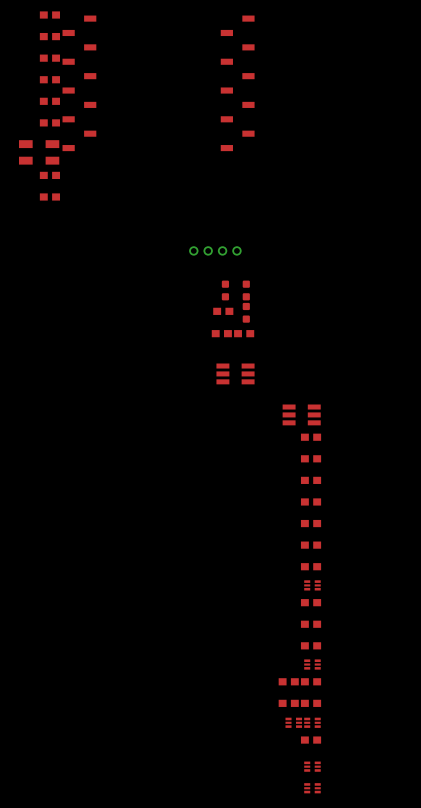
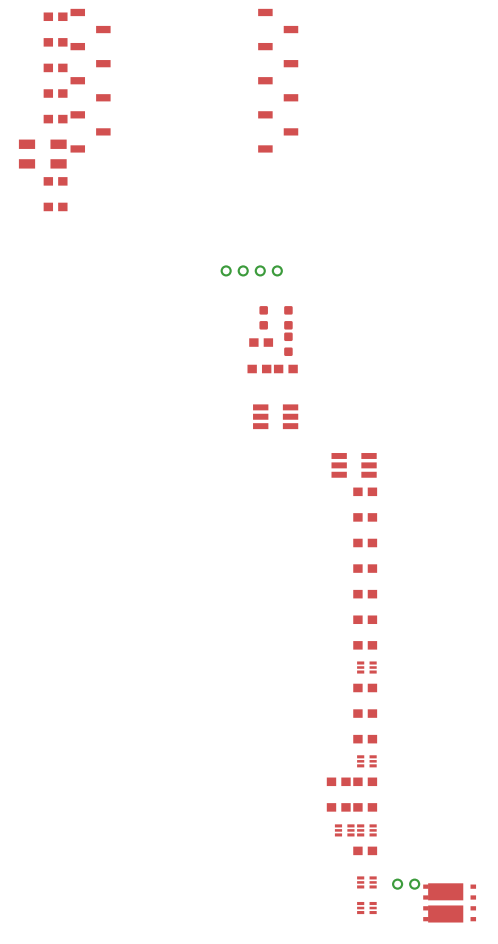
part: none -> (406, 884)
part: none -> (449, 902)

